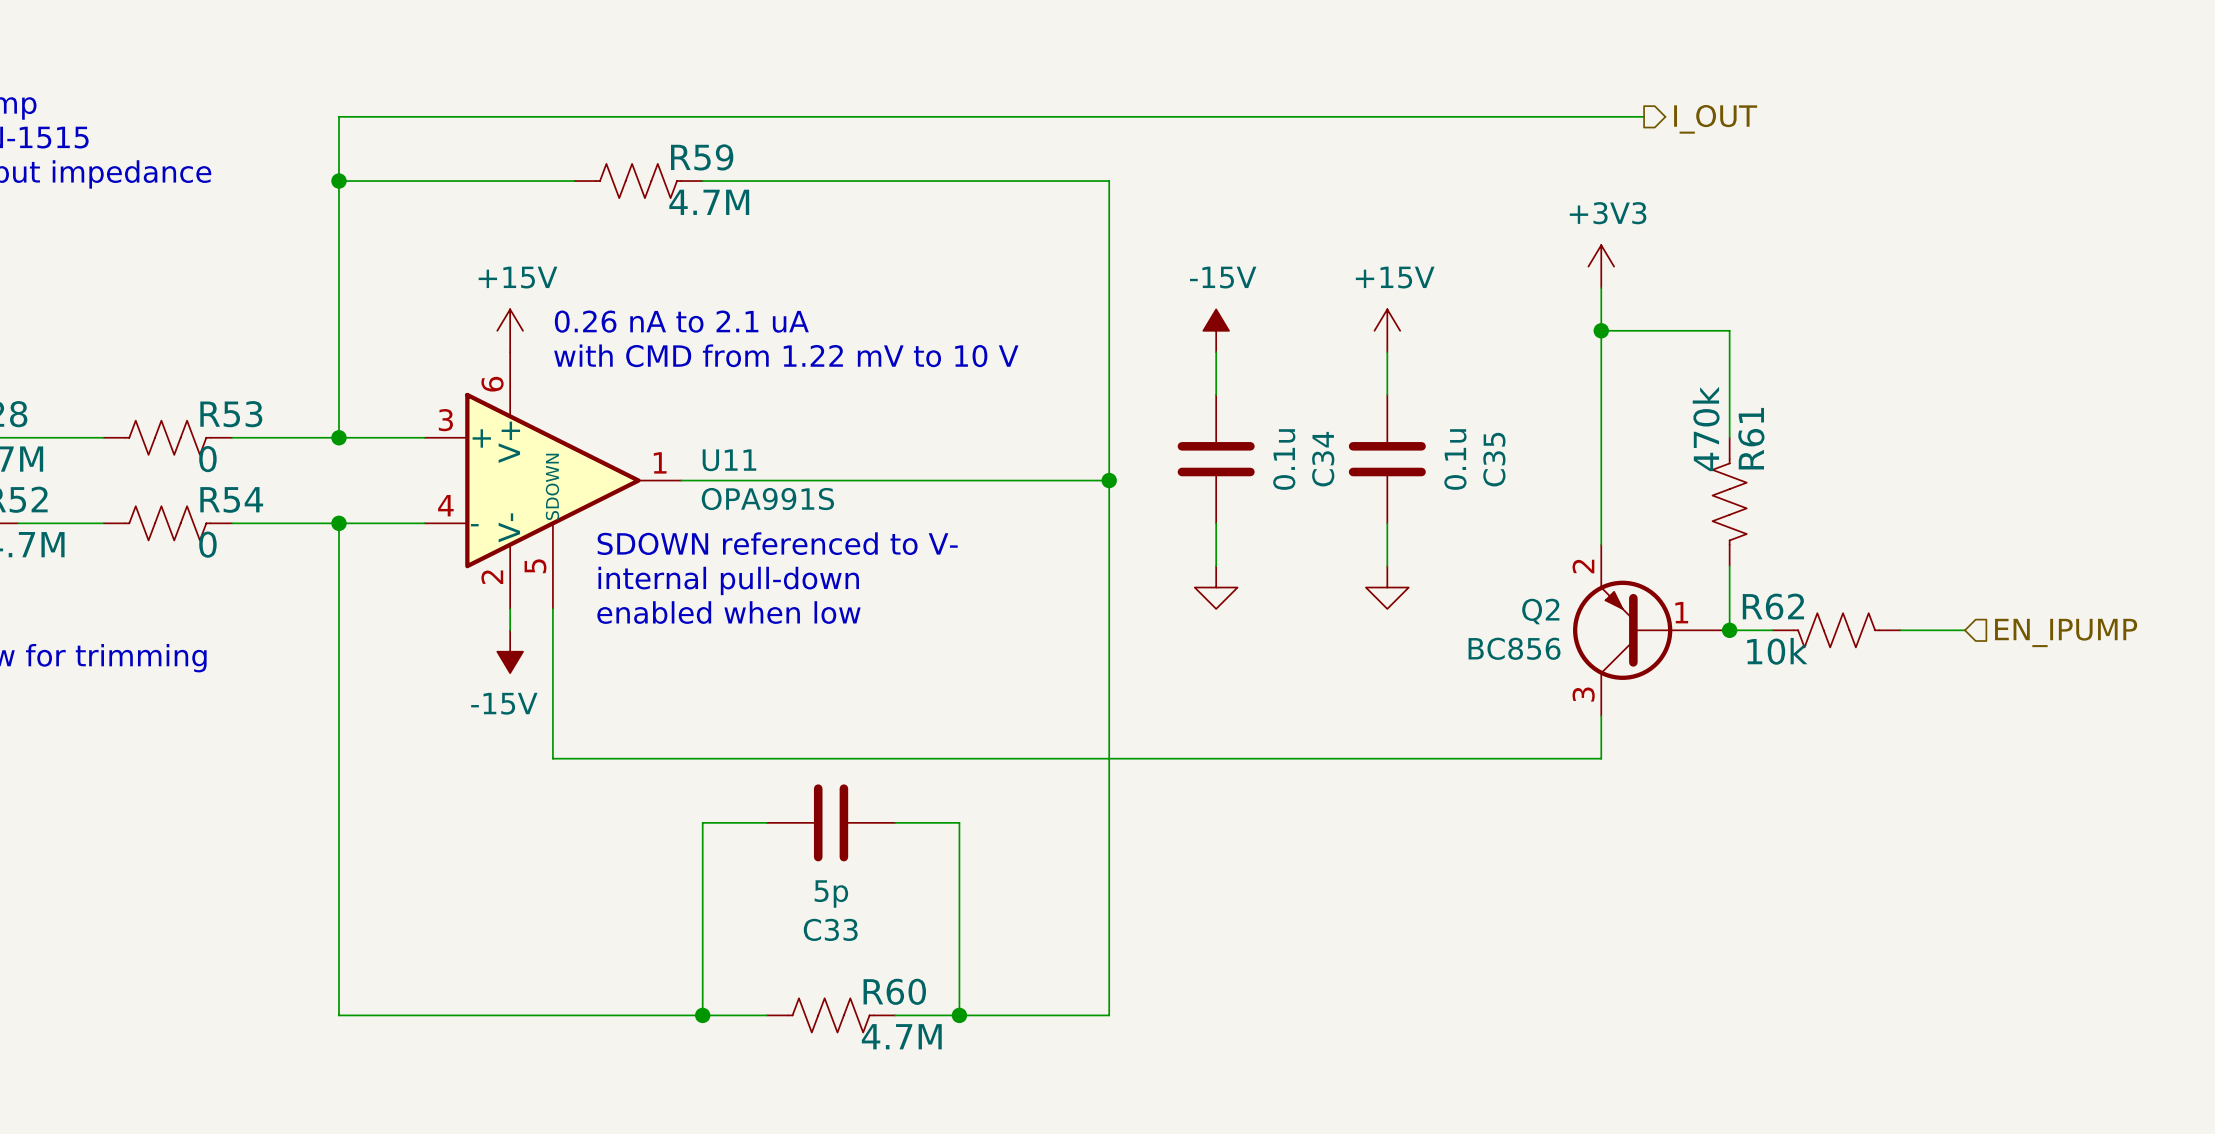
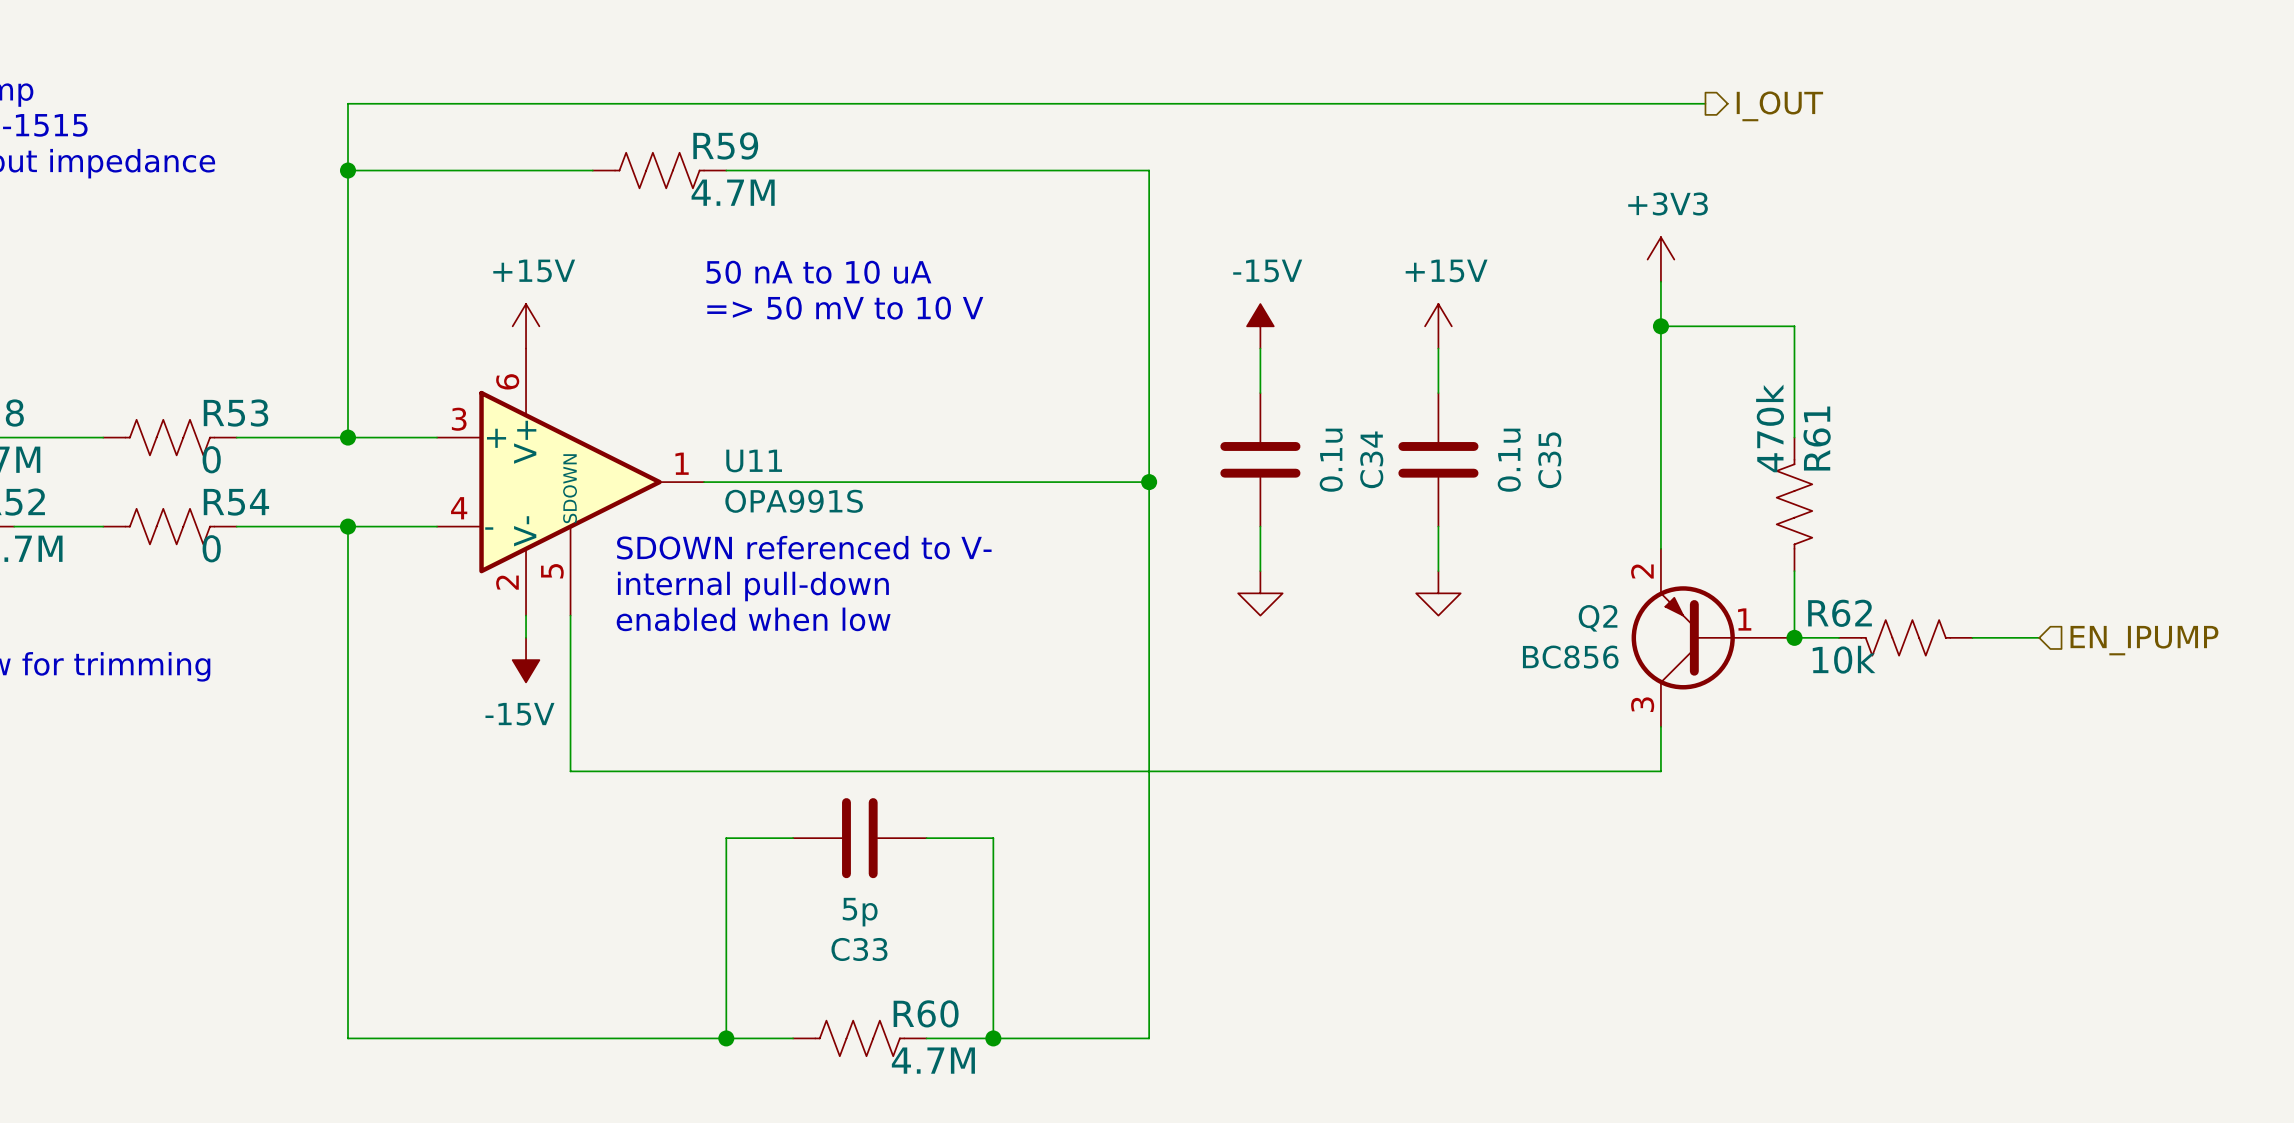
text: none -> => 50 mV to 10 V (845, 308)
text: 0.26 nA to 2.1 uA (681, 321) -> 50 nA to 10 uA (818, 272)
text: with CMD from 1.22 mV to 10 V (786, 355) -> none

